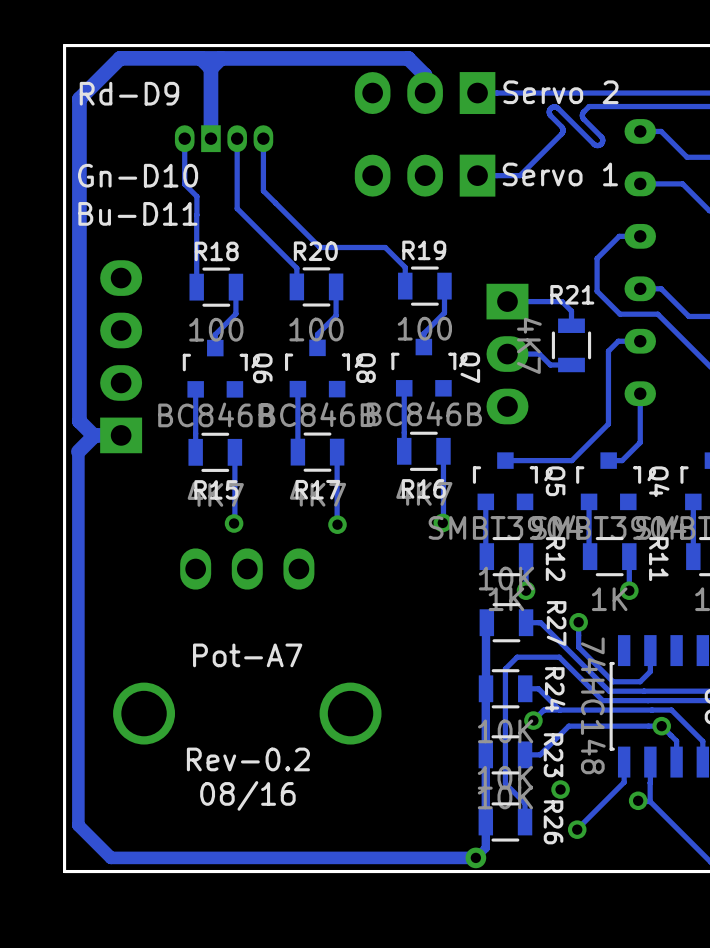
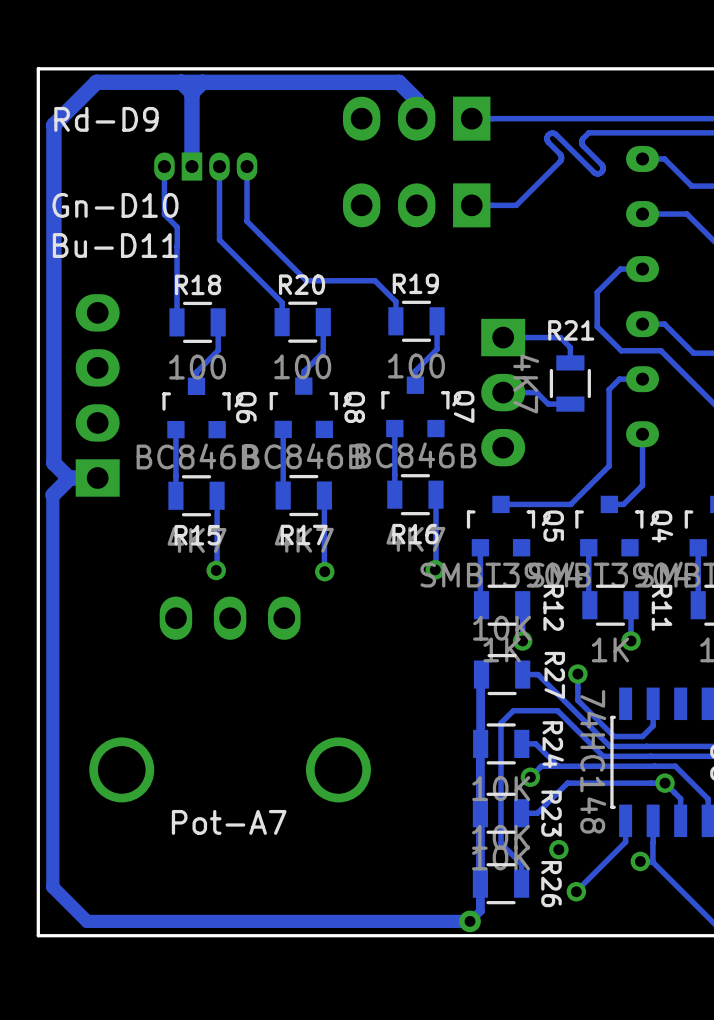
text: Servo 2 (560, 92) -> none
text: Servo 1 (560, 174) -> none
text: Pot-A7 (247, 655) -> none
text: Rev-0.2 (248, 759) -> Pot-A7 (229, 822)
text: 08/16 (247, 795) -> none

